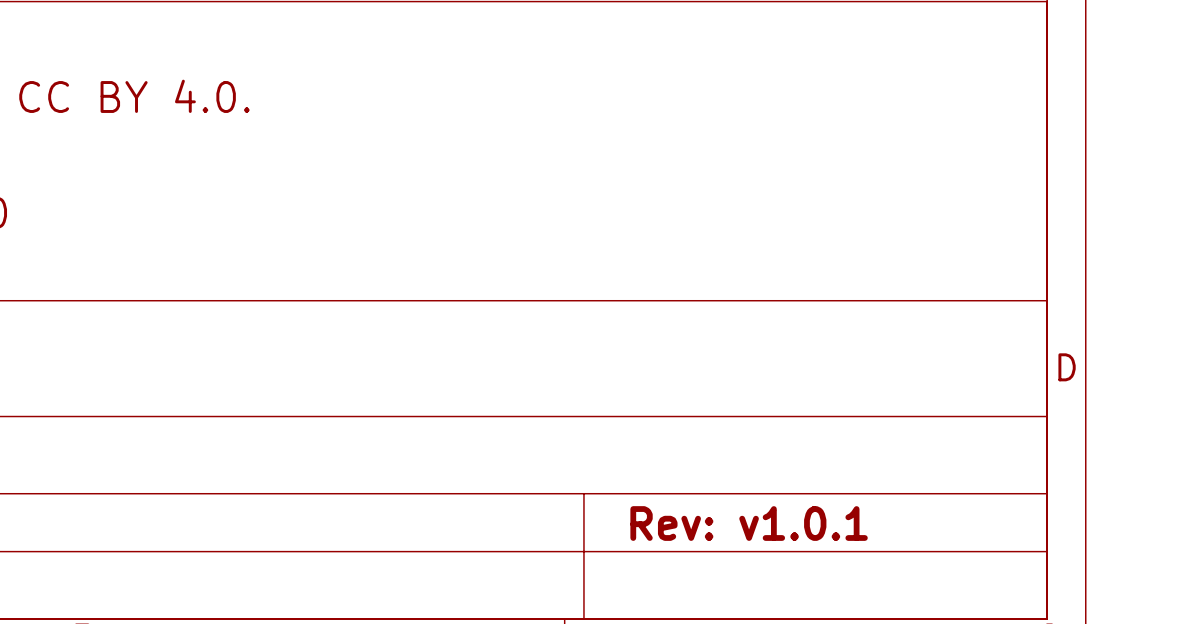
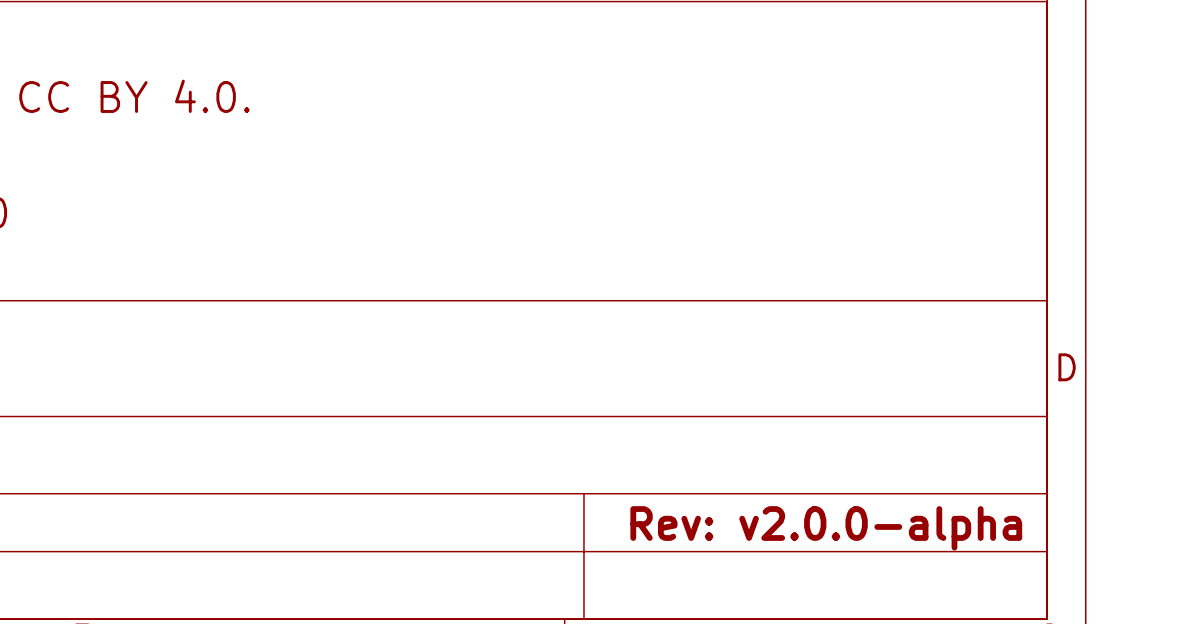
title block: Rev: v1.0.1 (749, 523) -> Rev: v2.0.0-alpha (826, 528)

